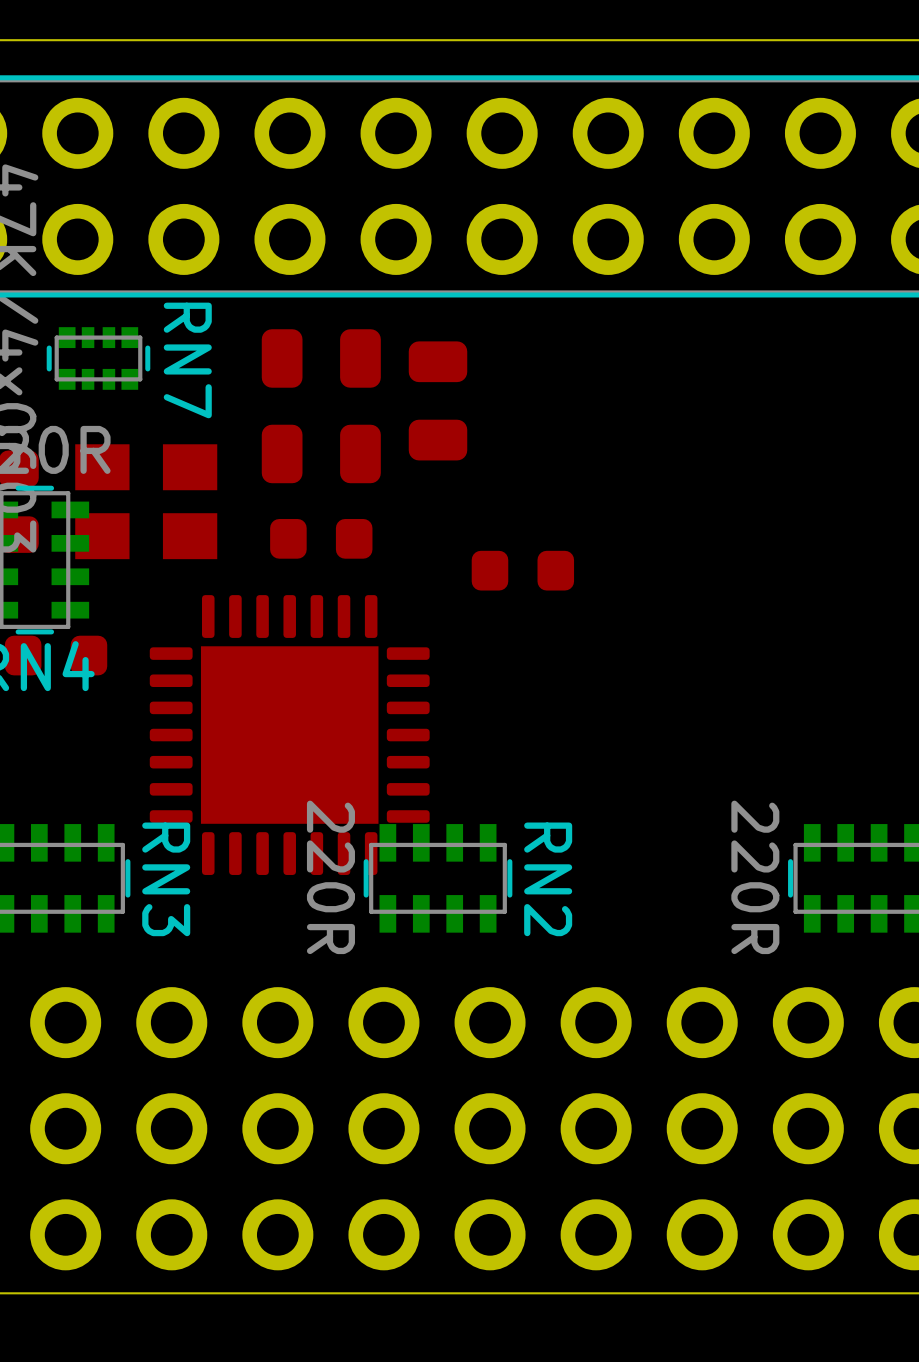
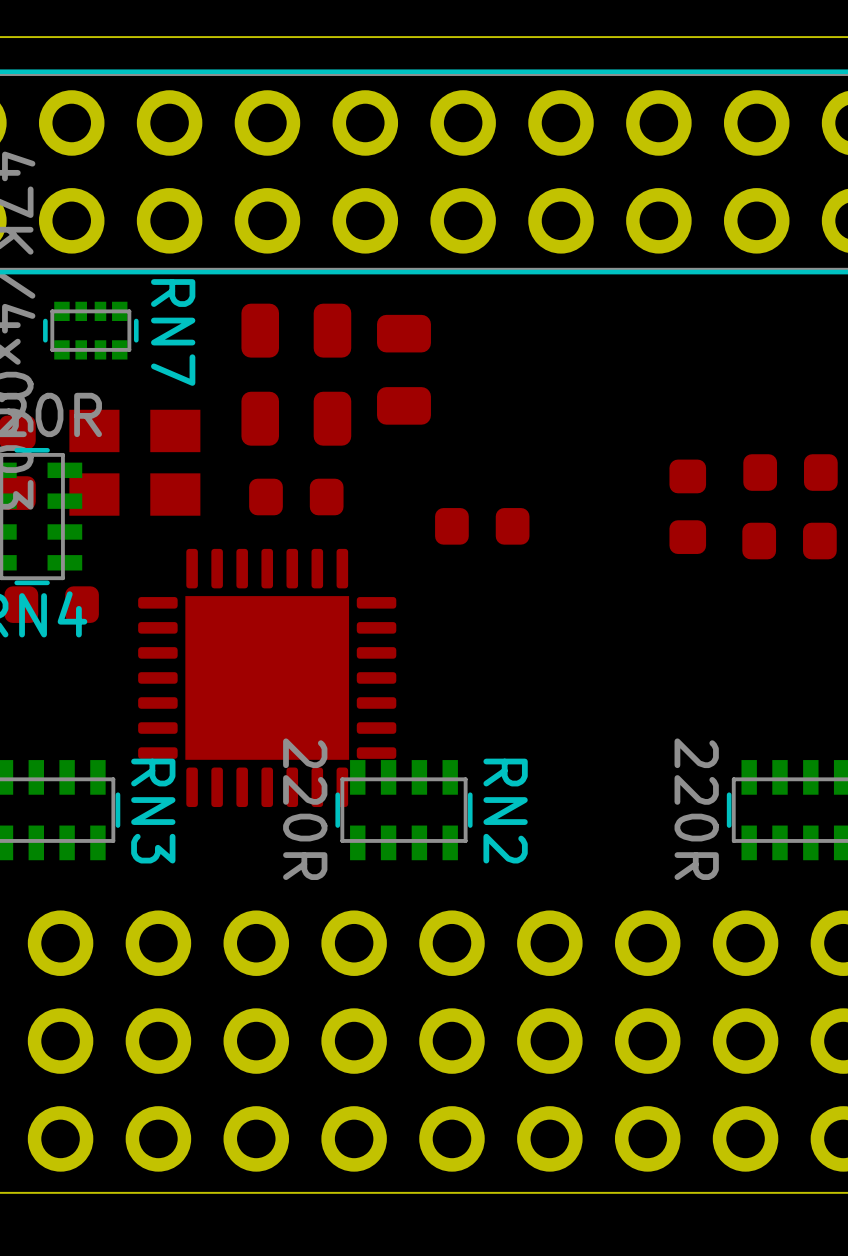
part: none -> (790, 472)
part: none -> (687, 506)
part: none -> (789, 541)

